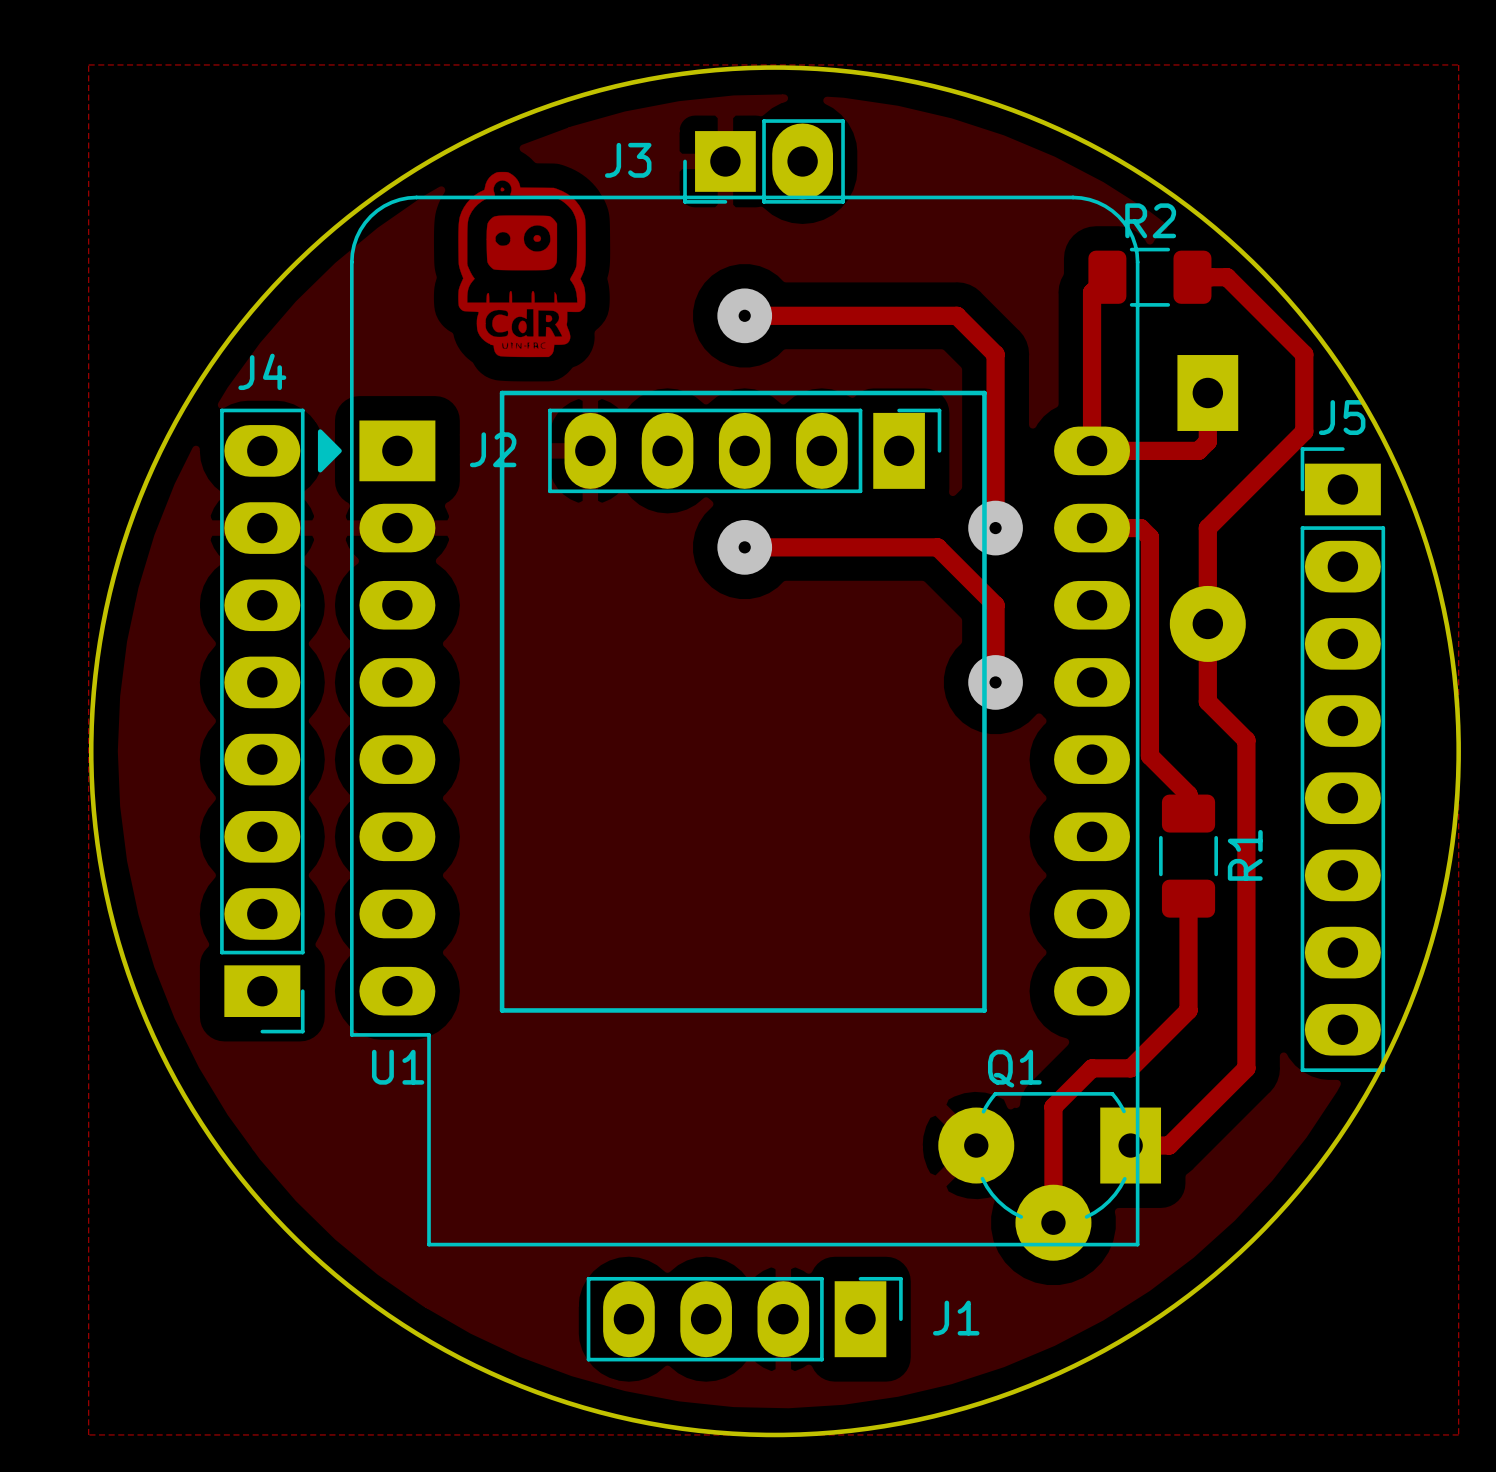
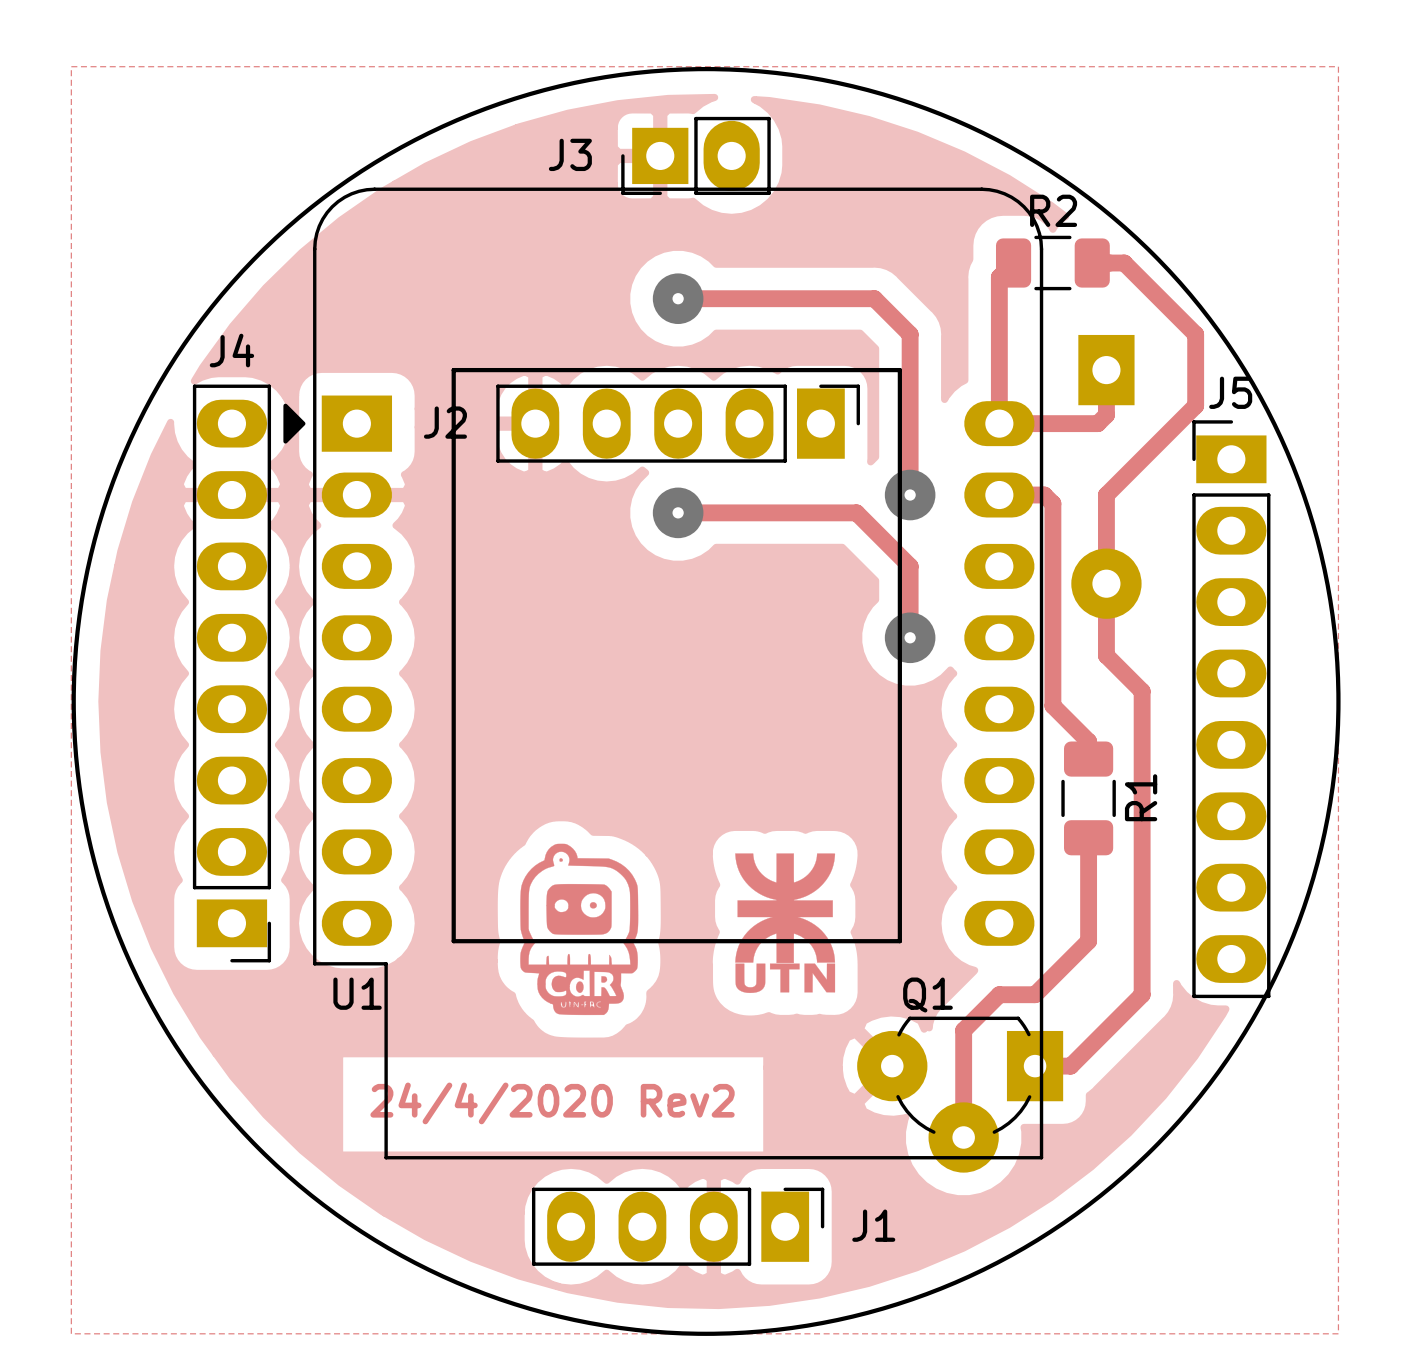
drawing position: (522, 264) -> (579, 929)
drawing: none -> [735, 853, 836, 994]
text: none -> 24/4/2020 Rev2 (552, 1103)

